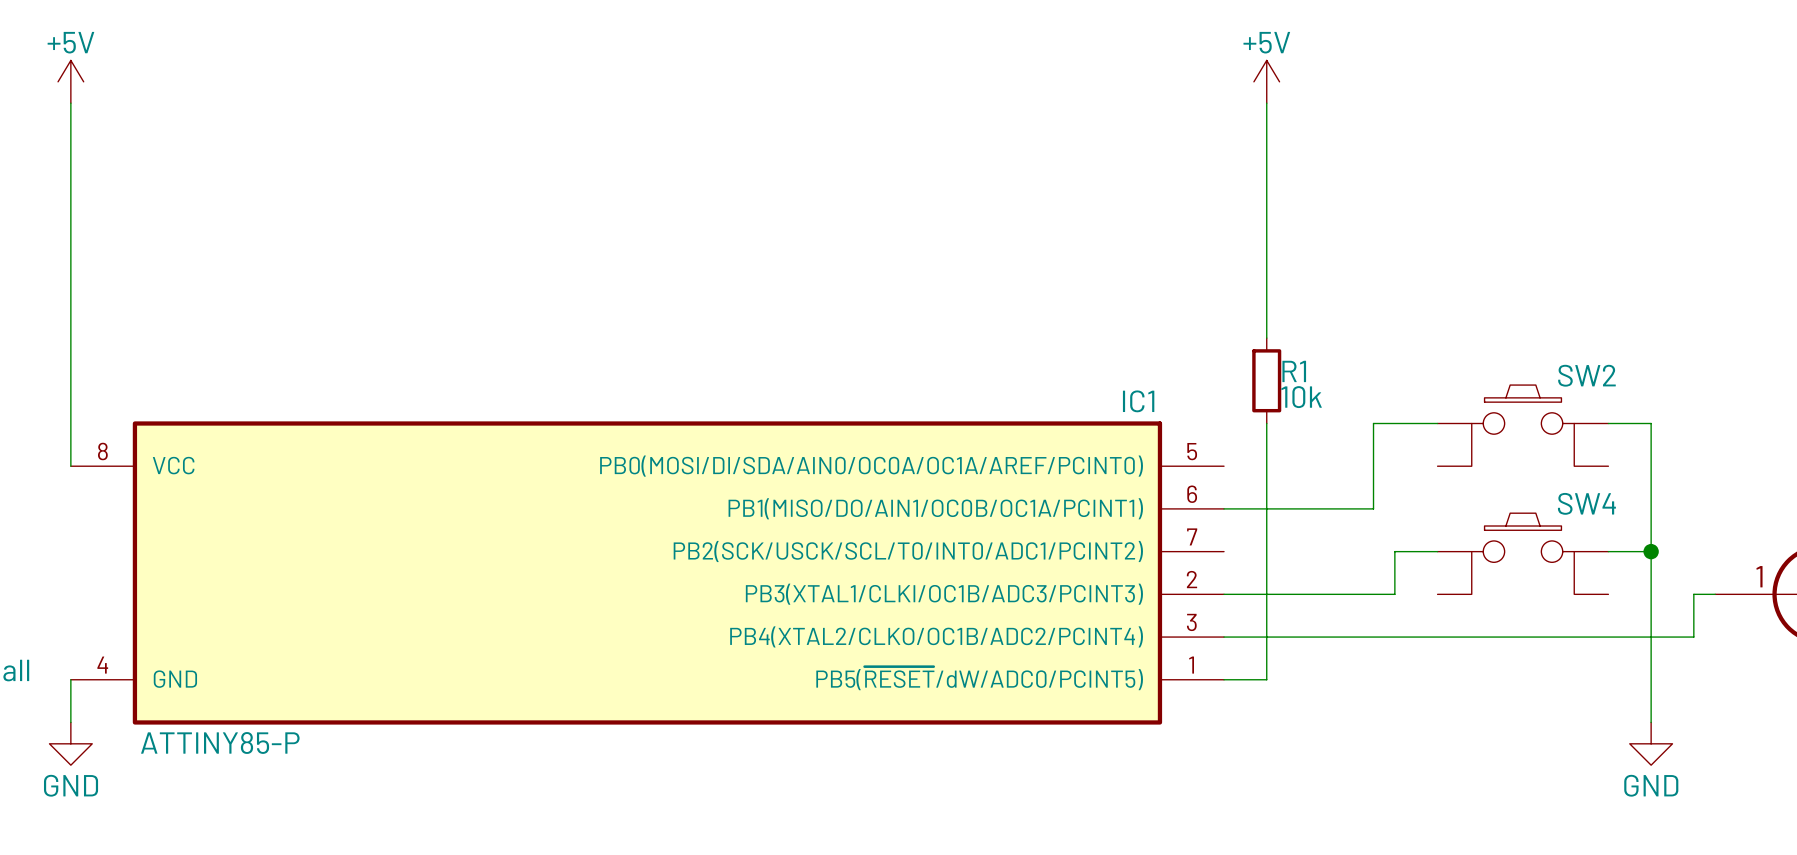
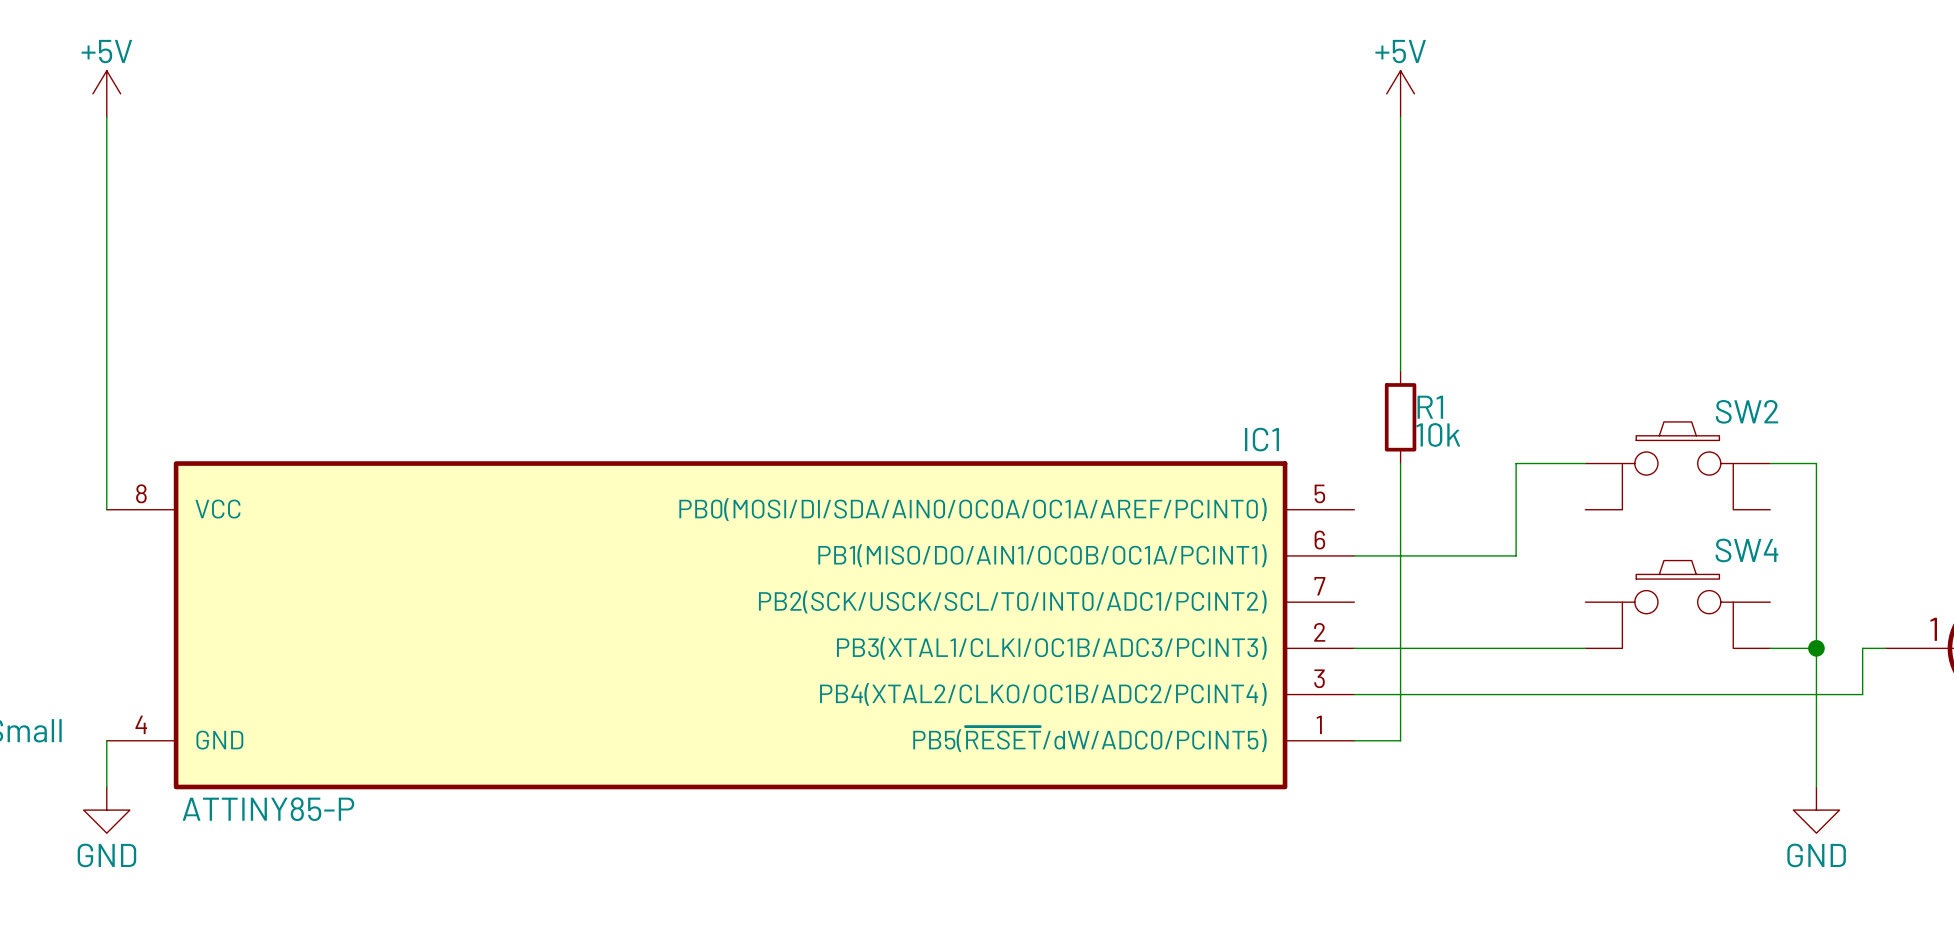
wire: (1437, 551) (1394, 551) (1394, 594) -> (1585, 648) (1539, 648)
wire: (1608, 551) (1651, 551) -> (1770, 648) (1816, 648)
junction position: (1651, 551) -> (1816, 648)

